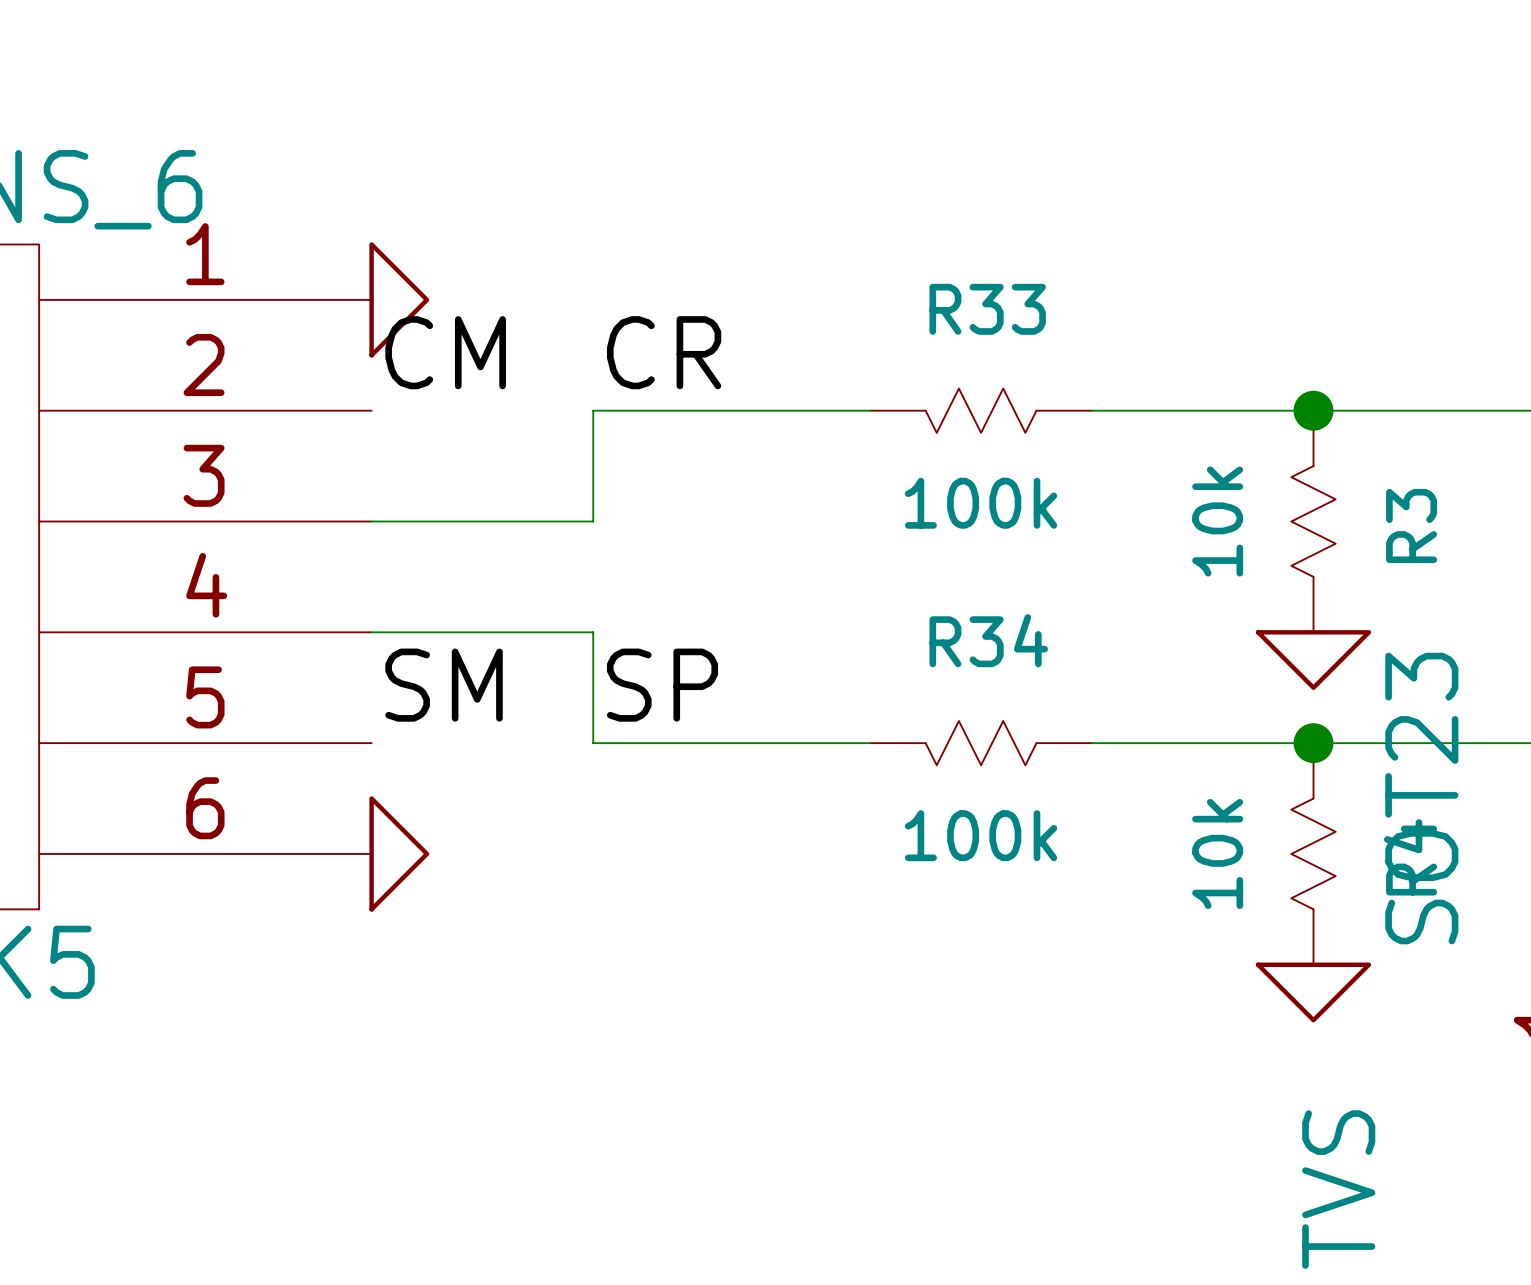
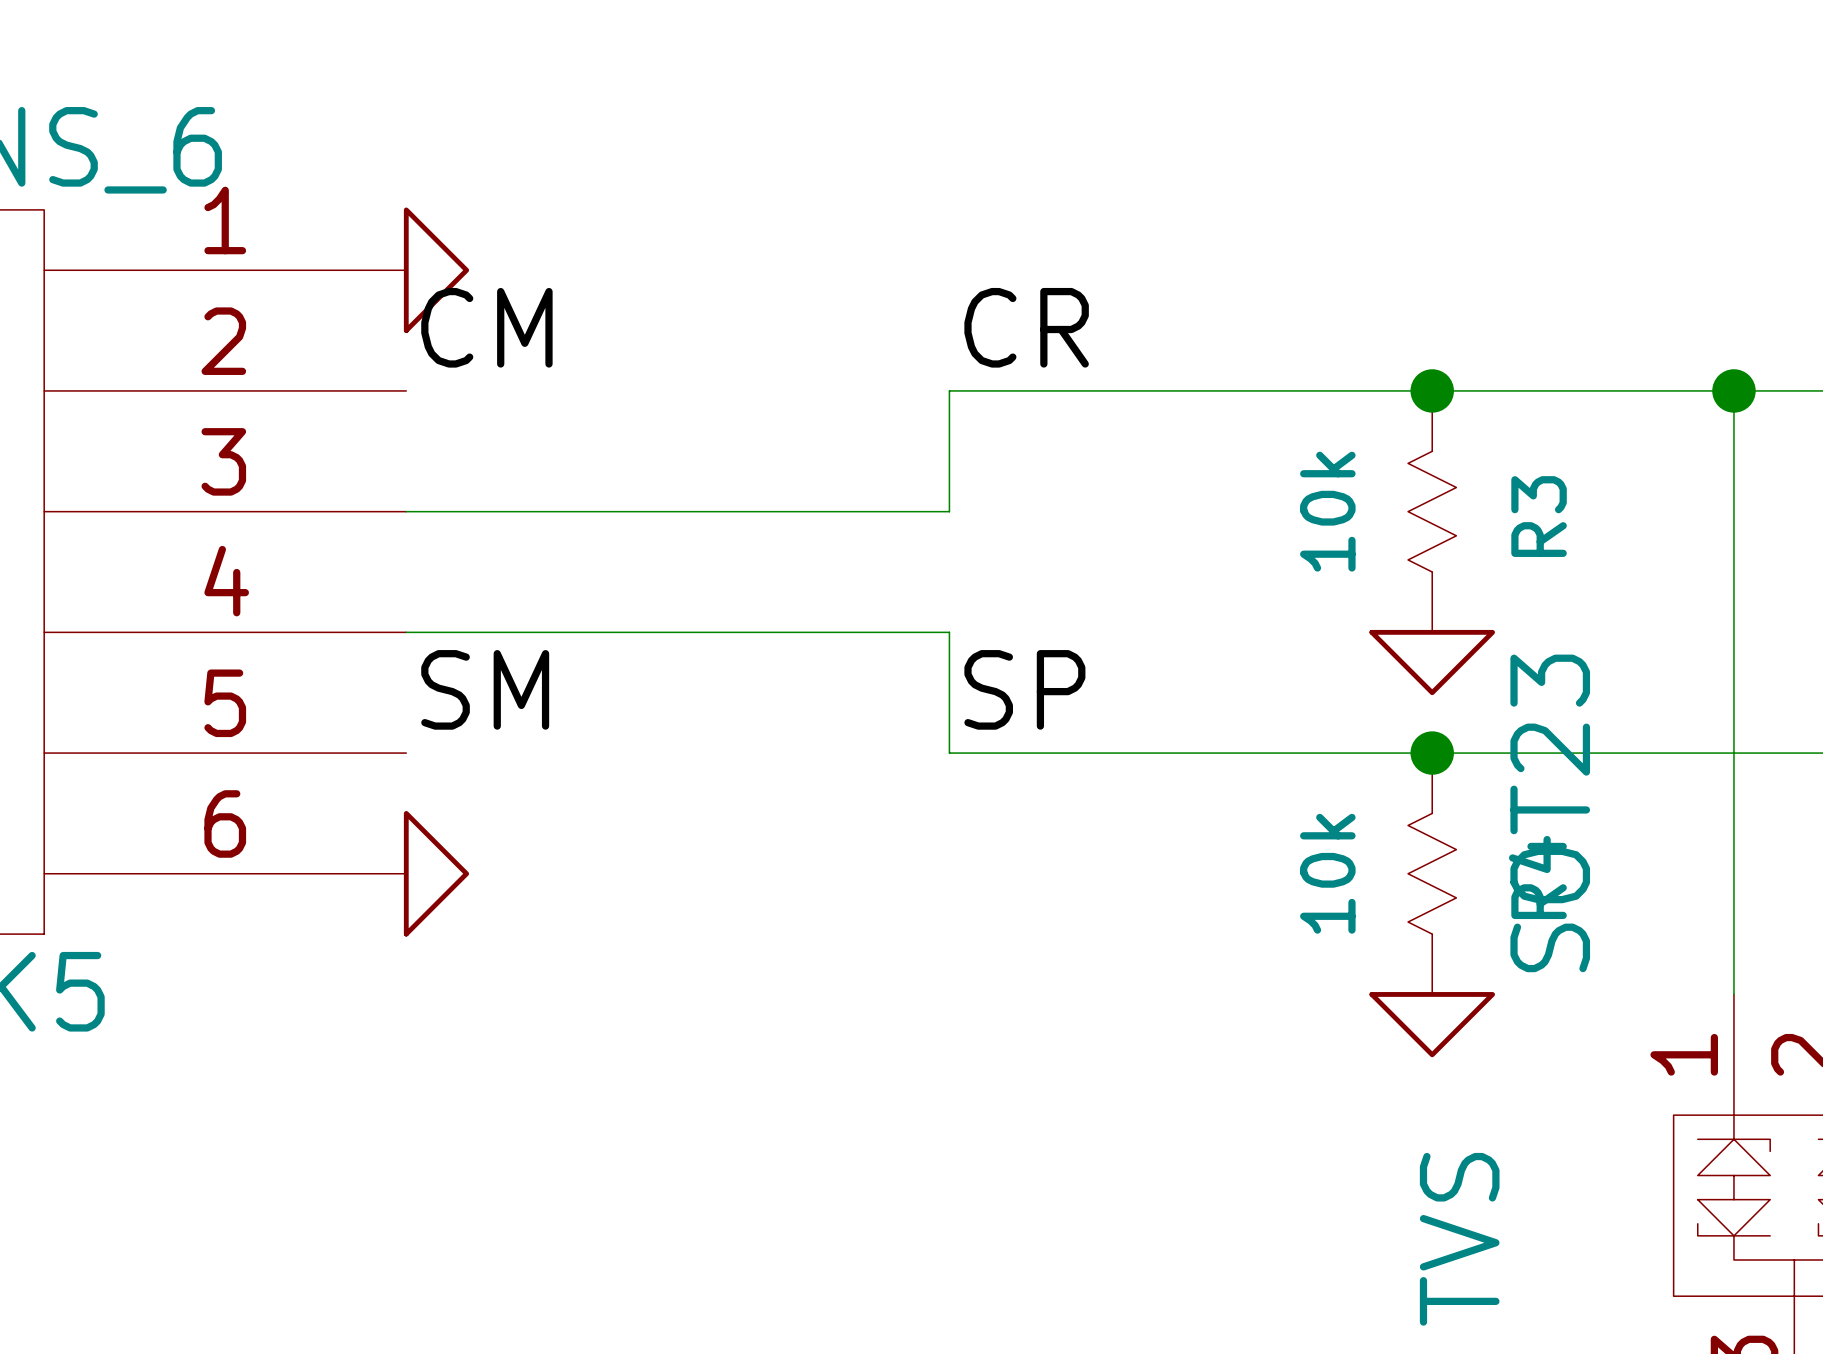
label position: CR (664, 352) -> CR (1026, 327)
wire: (870, 410) (593, 410) (593, 521) -> (1190, 390) (949, 390) (949, 511) (647, 511)
R33: 100k (981, 410) -> none
wire: (593, 632) (593, 743) (870, 743) -> (647, 632) (949, 632) (949, 753) (1190, 753)
label position: SP (662, 685) -> SP (1024, 689)
R34: 100k (981, 743) -> none

